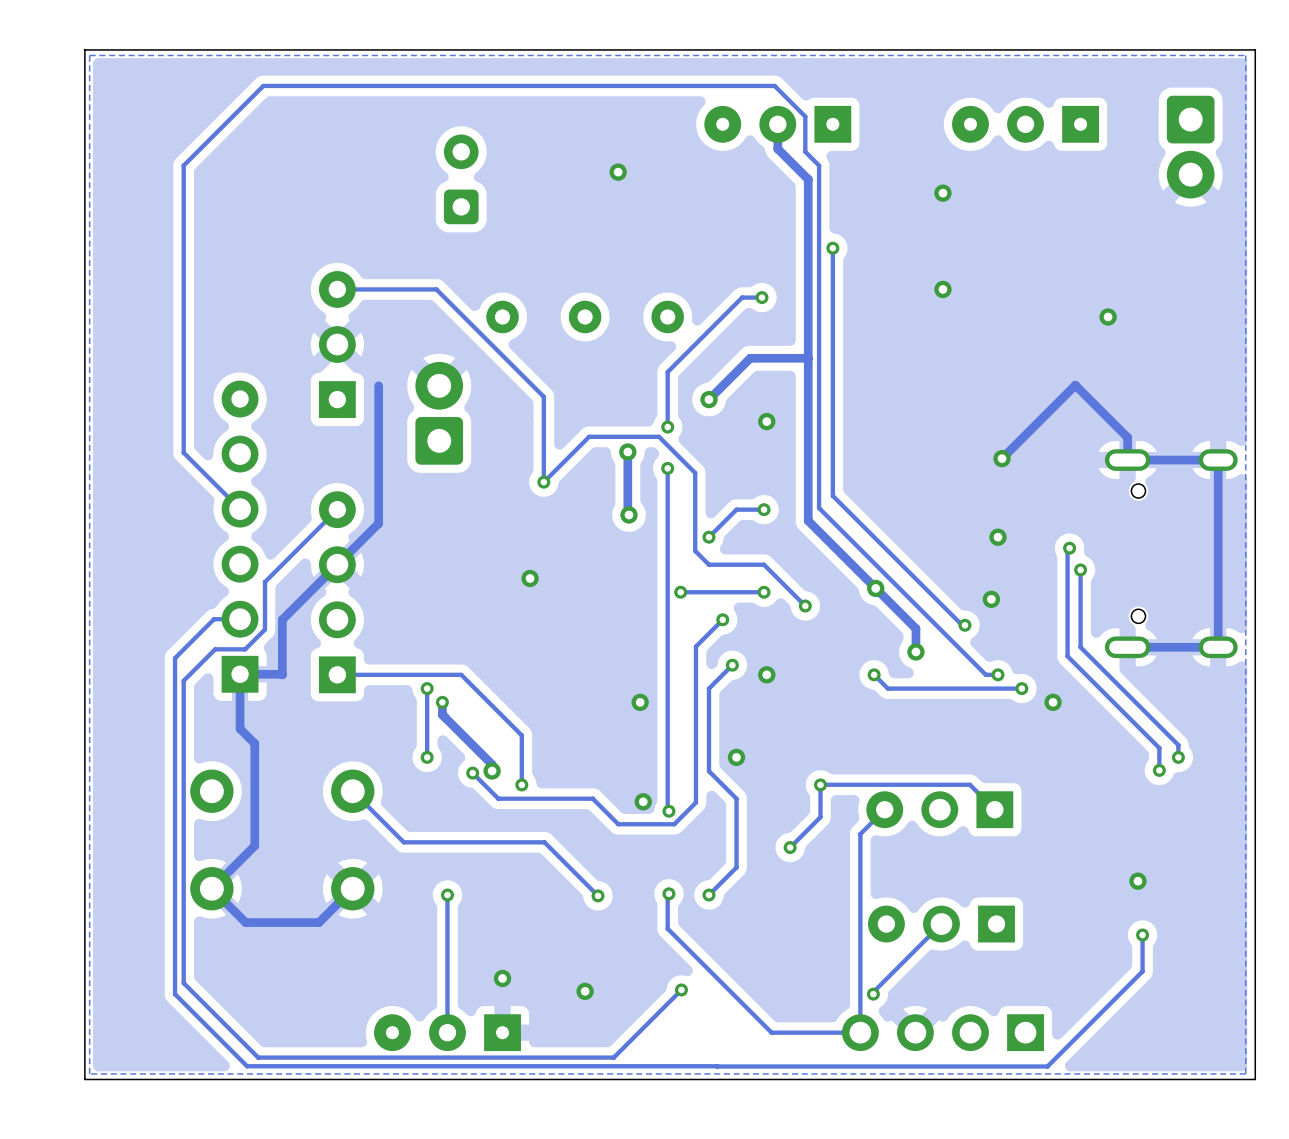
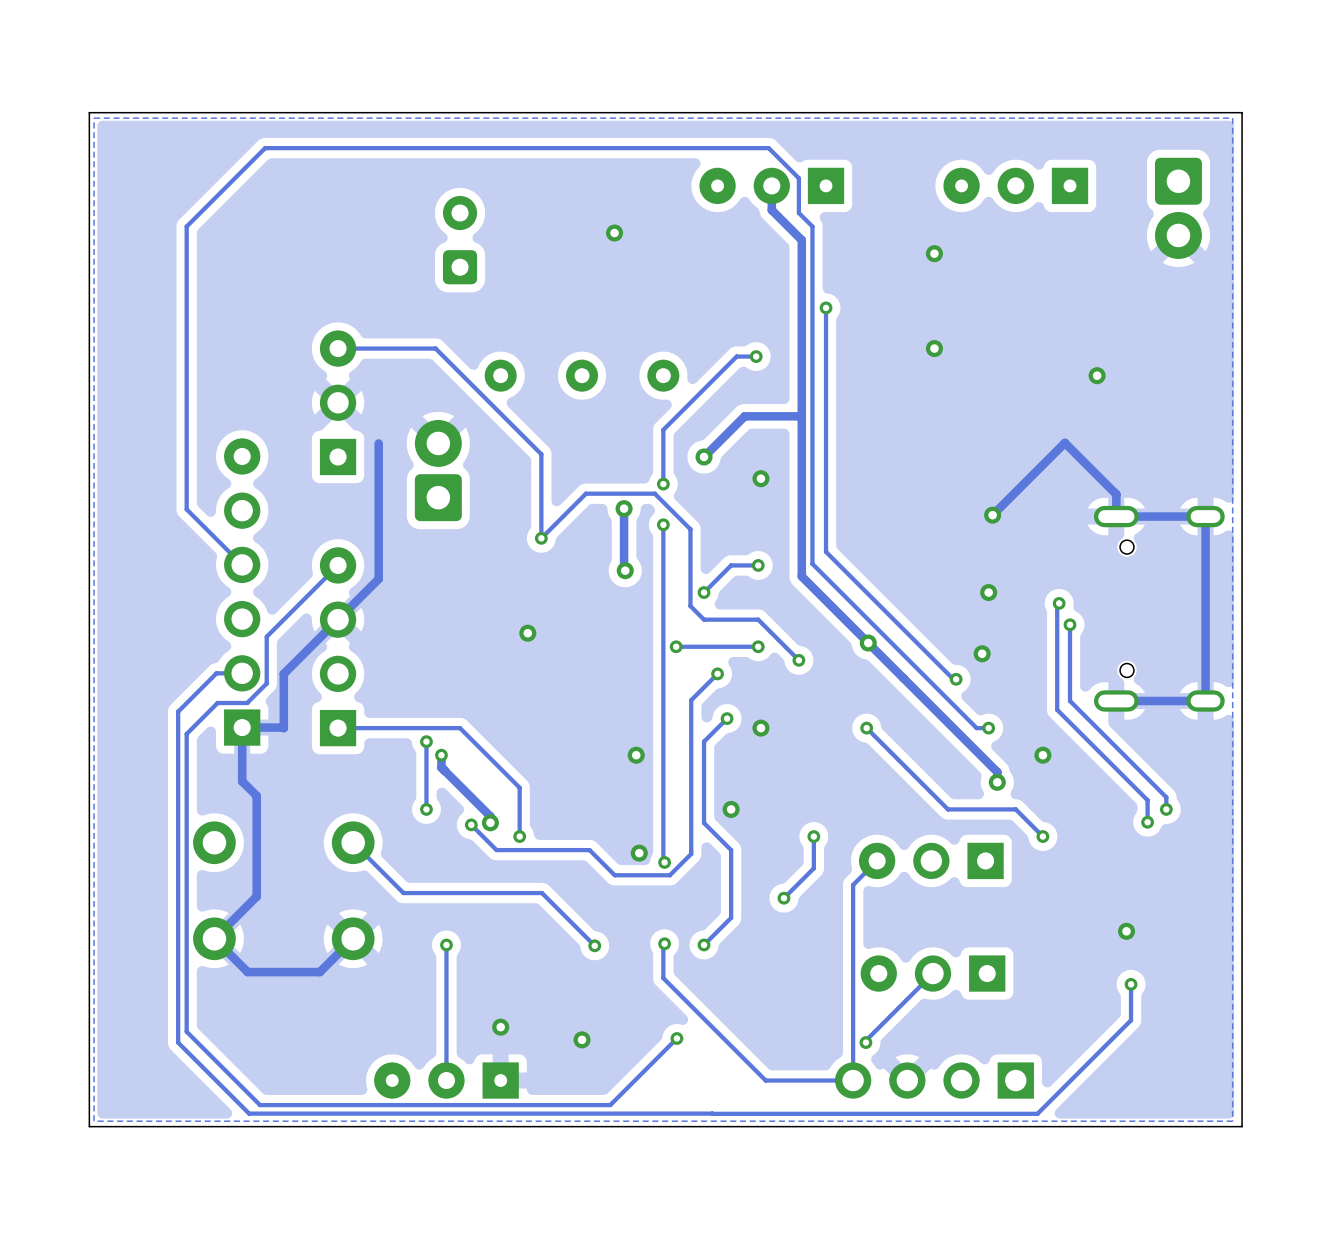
track: (915, 628) (915, 651) -> (907, 682) (997, 772) (997, 782)
via position: (915, 651) -> (997, 782)
track: (1021, 688) (887, 688) -> (1042, 836) (1015, 809) (948, 809) (880, 741)
via position: (1021, 688) -> (1042, 836)
track: (820, 784) (969, 784) (994, 809) -> none

